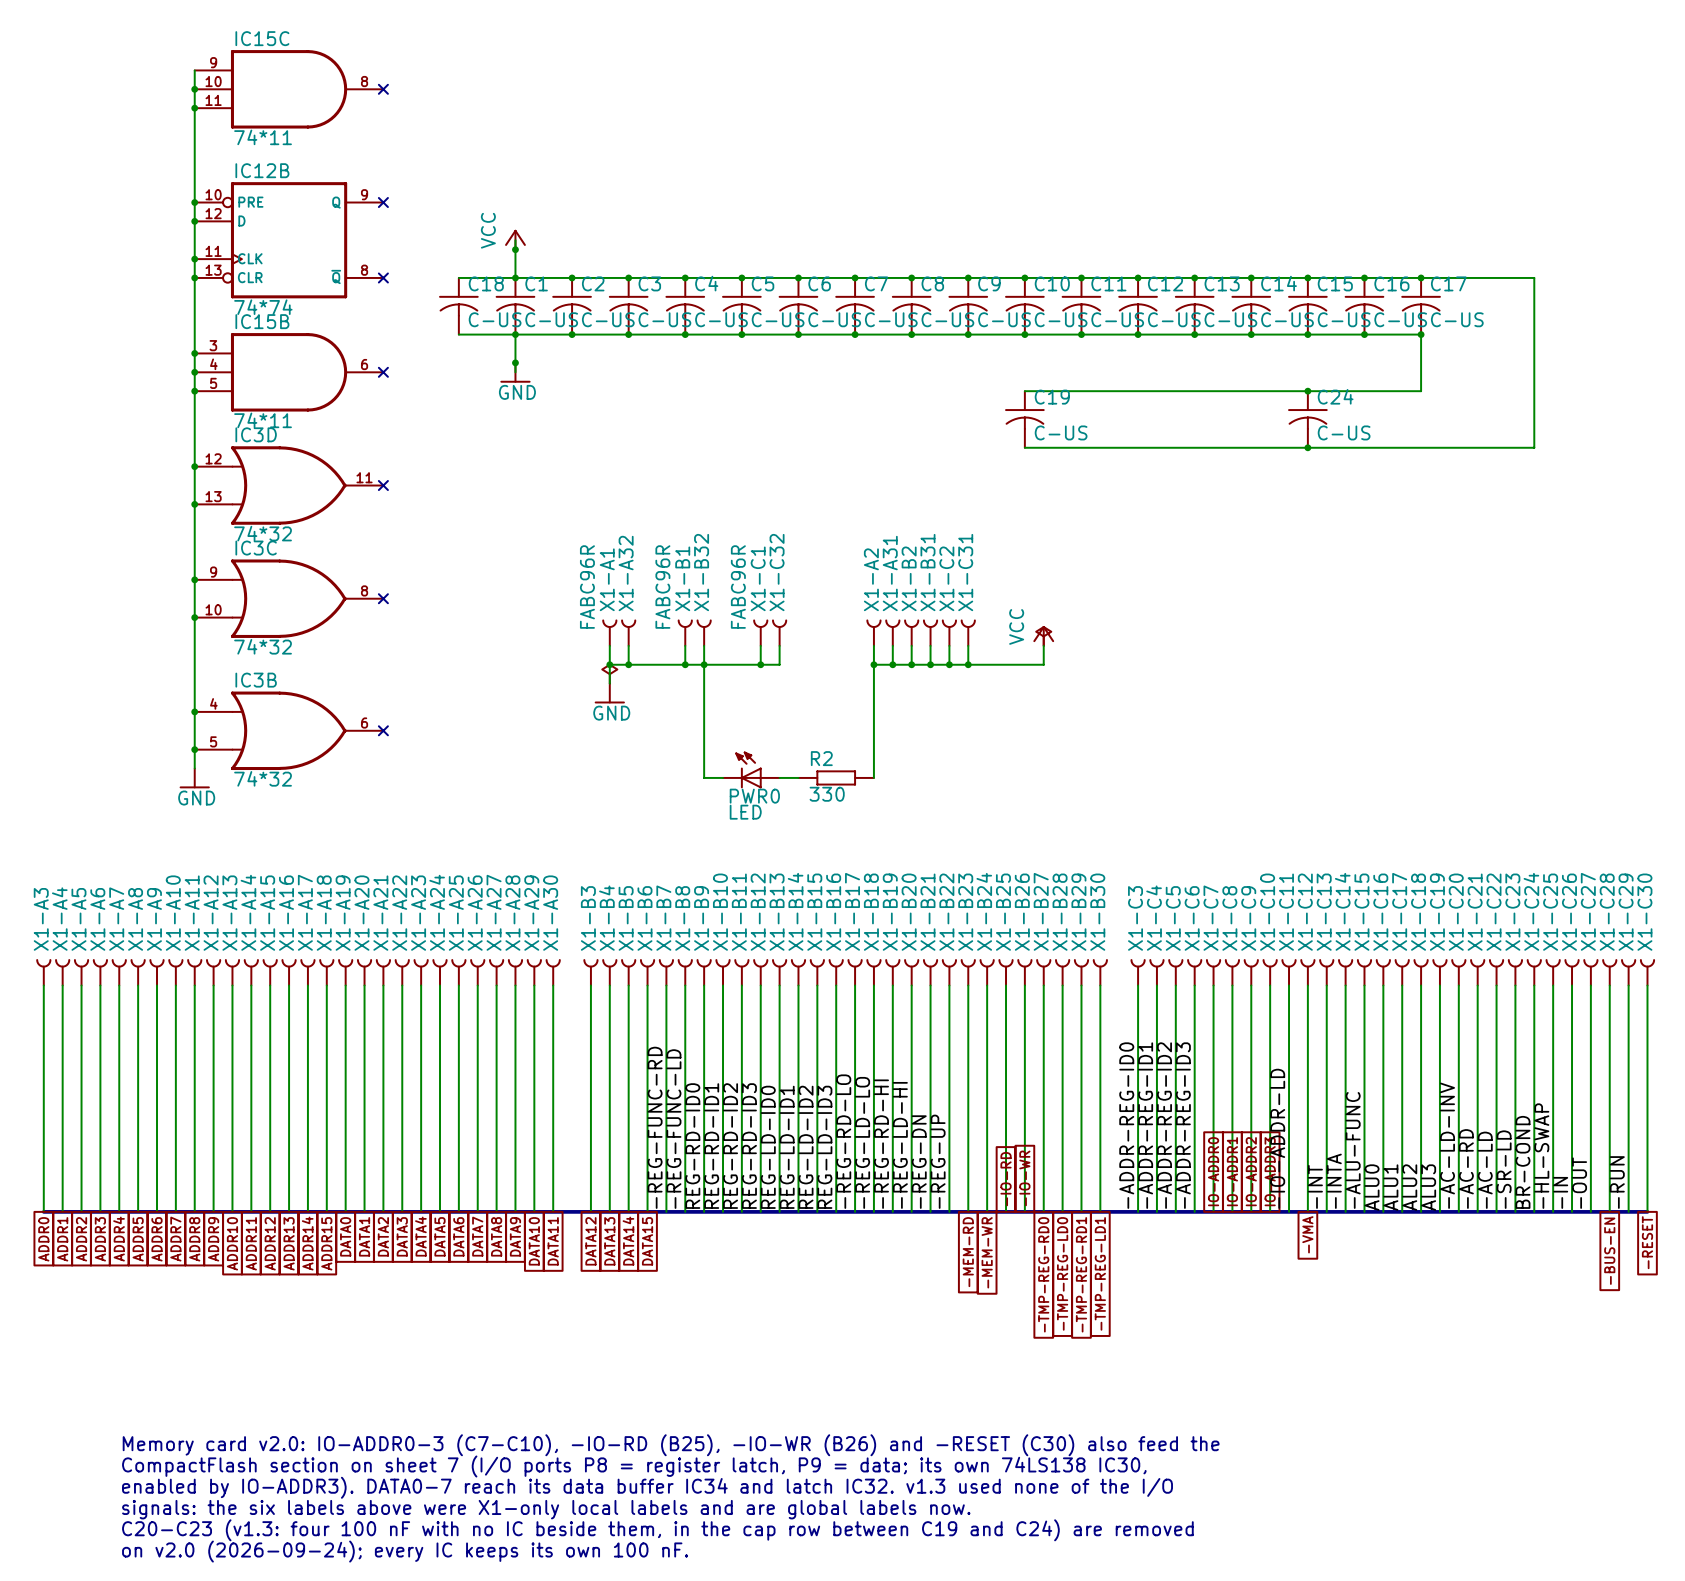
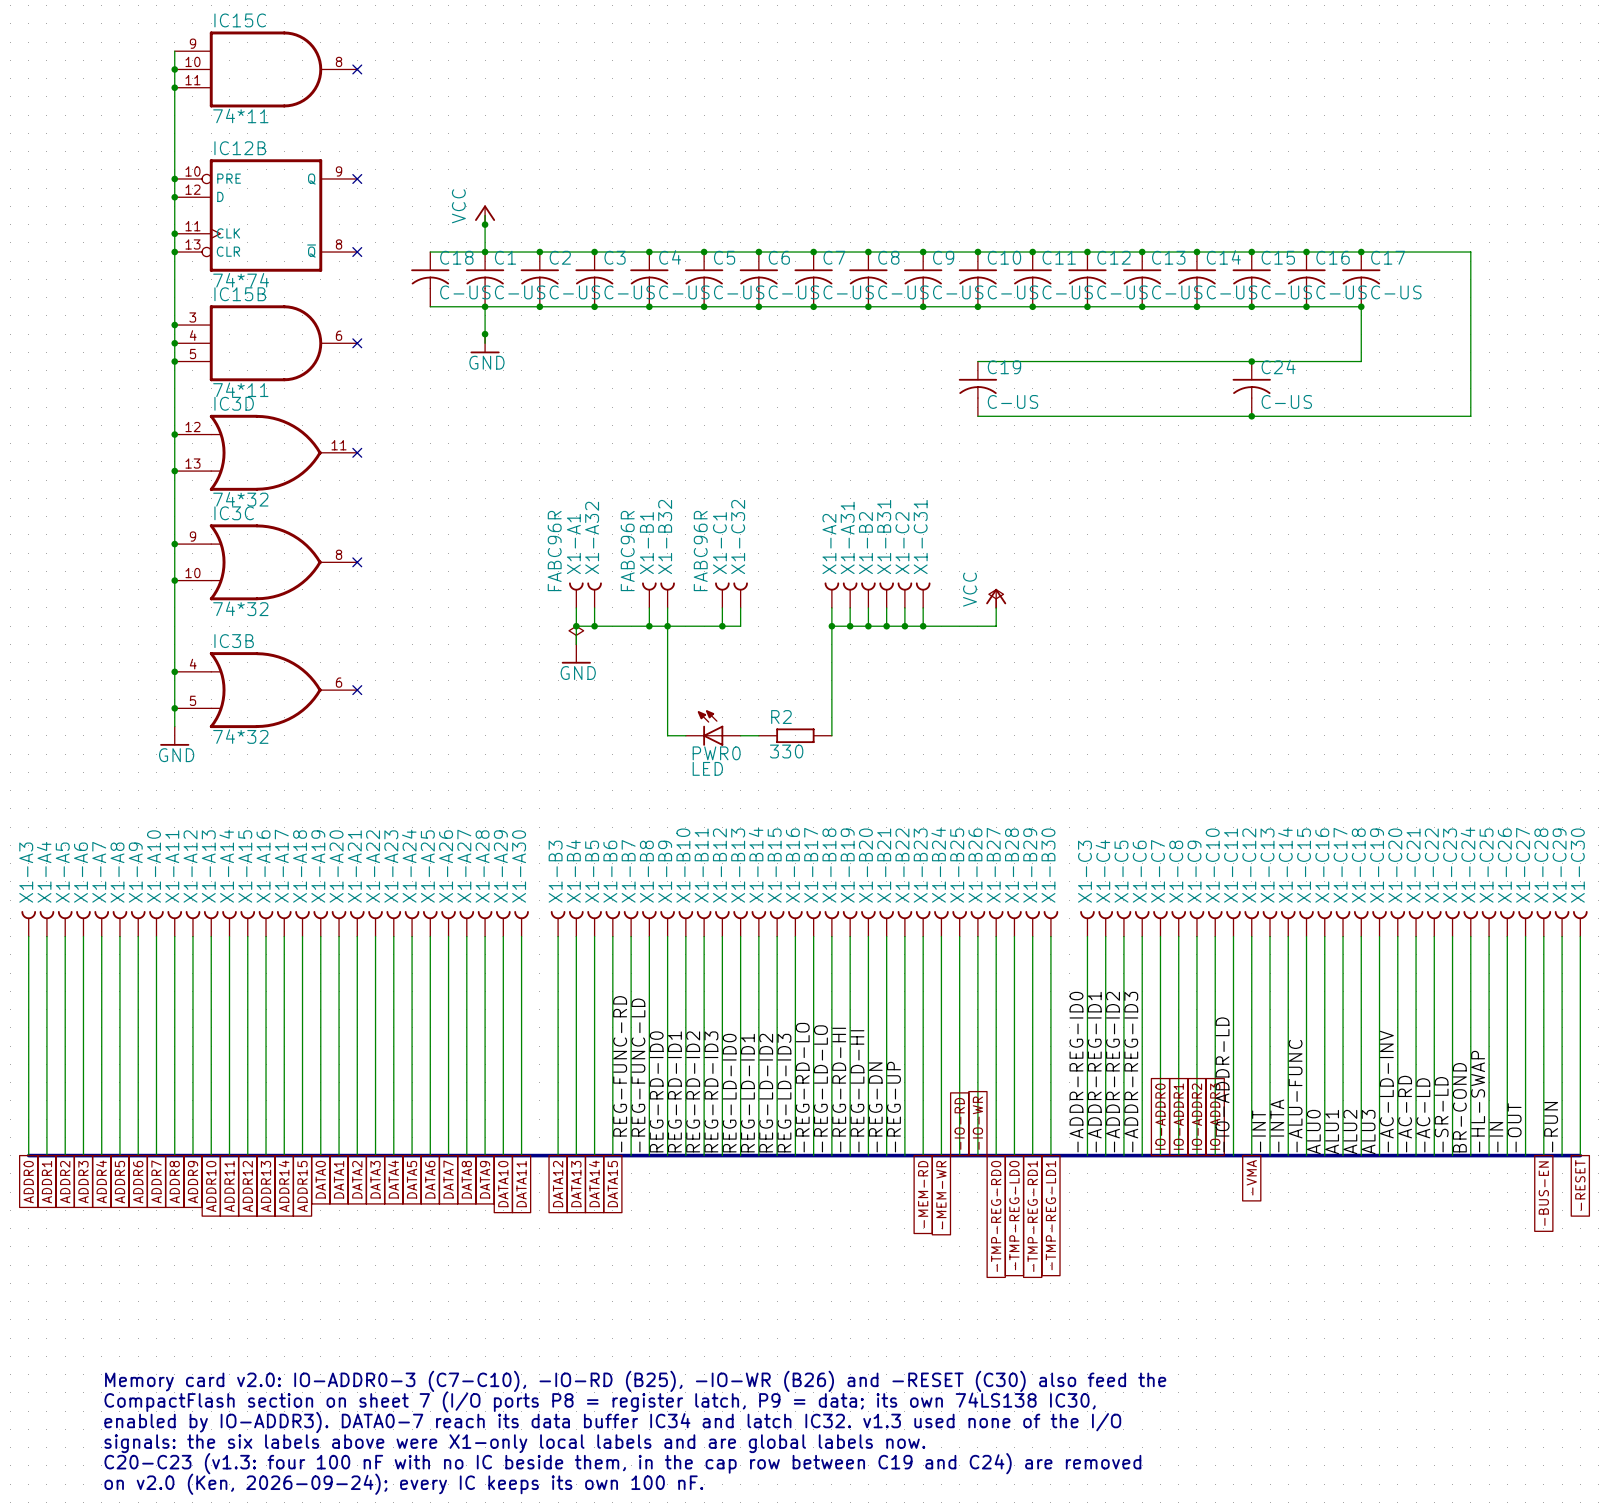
text: on v2.0 (2026-09-24); every IC keeps its own 100 nF. (405, 1551) -> on v2.0 (Ken, 2026-09-24); every IC keeps its own 100 nF. (403, 1484)

